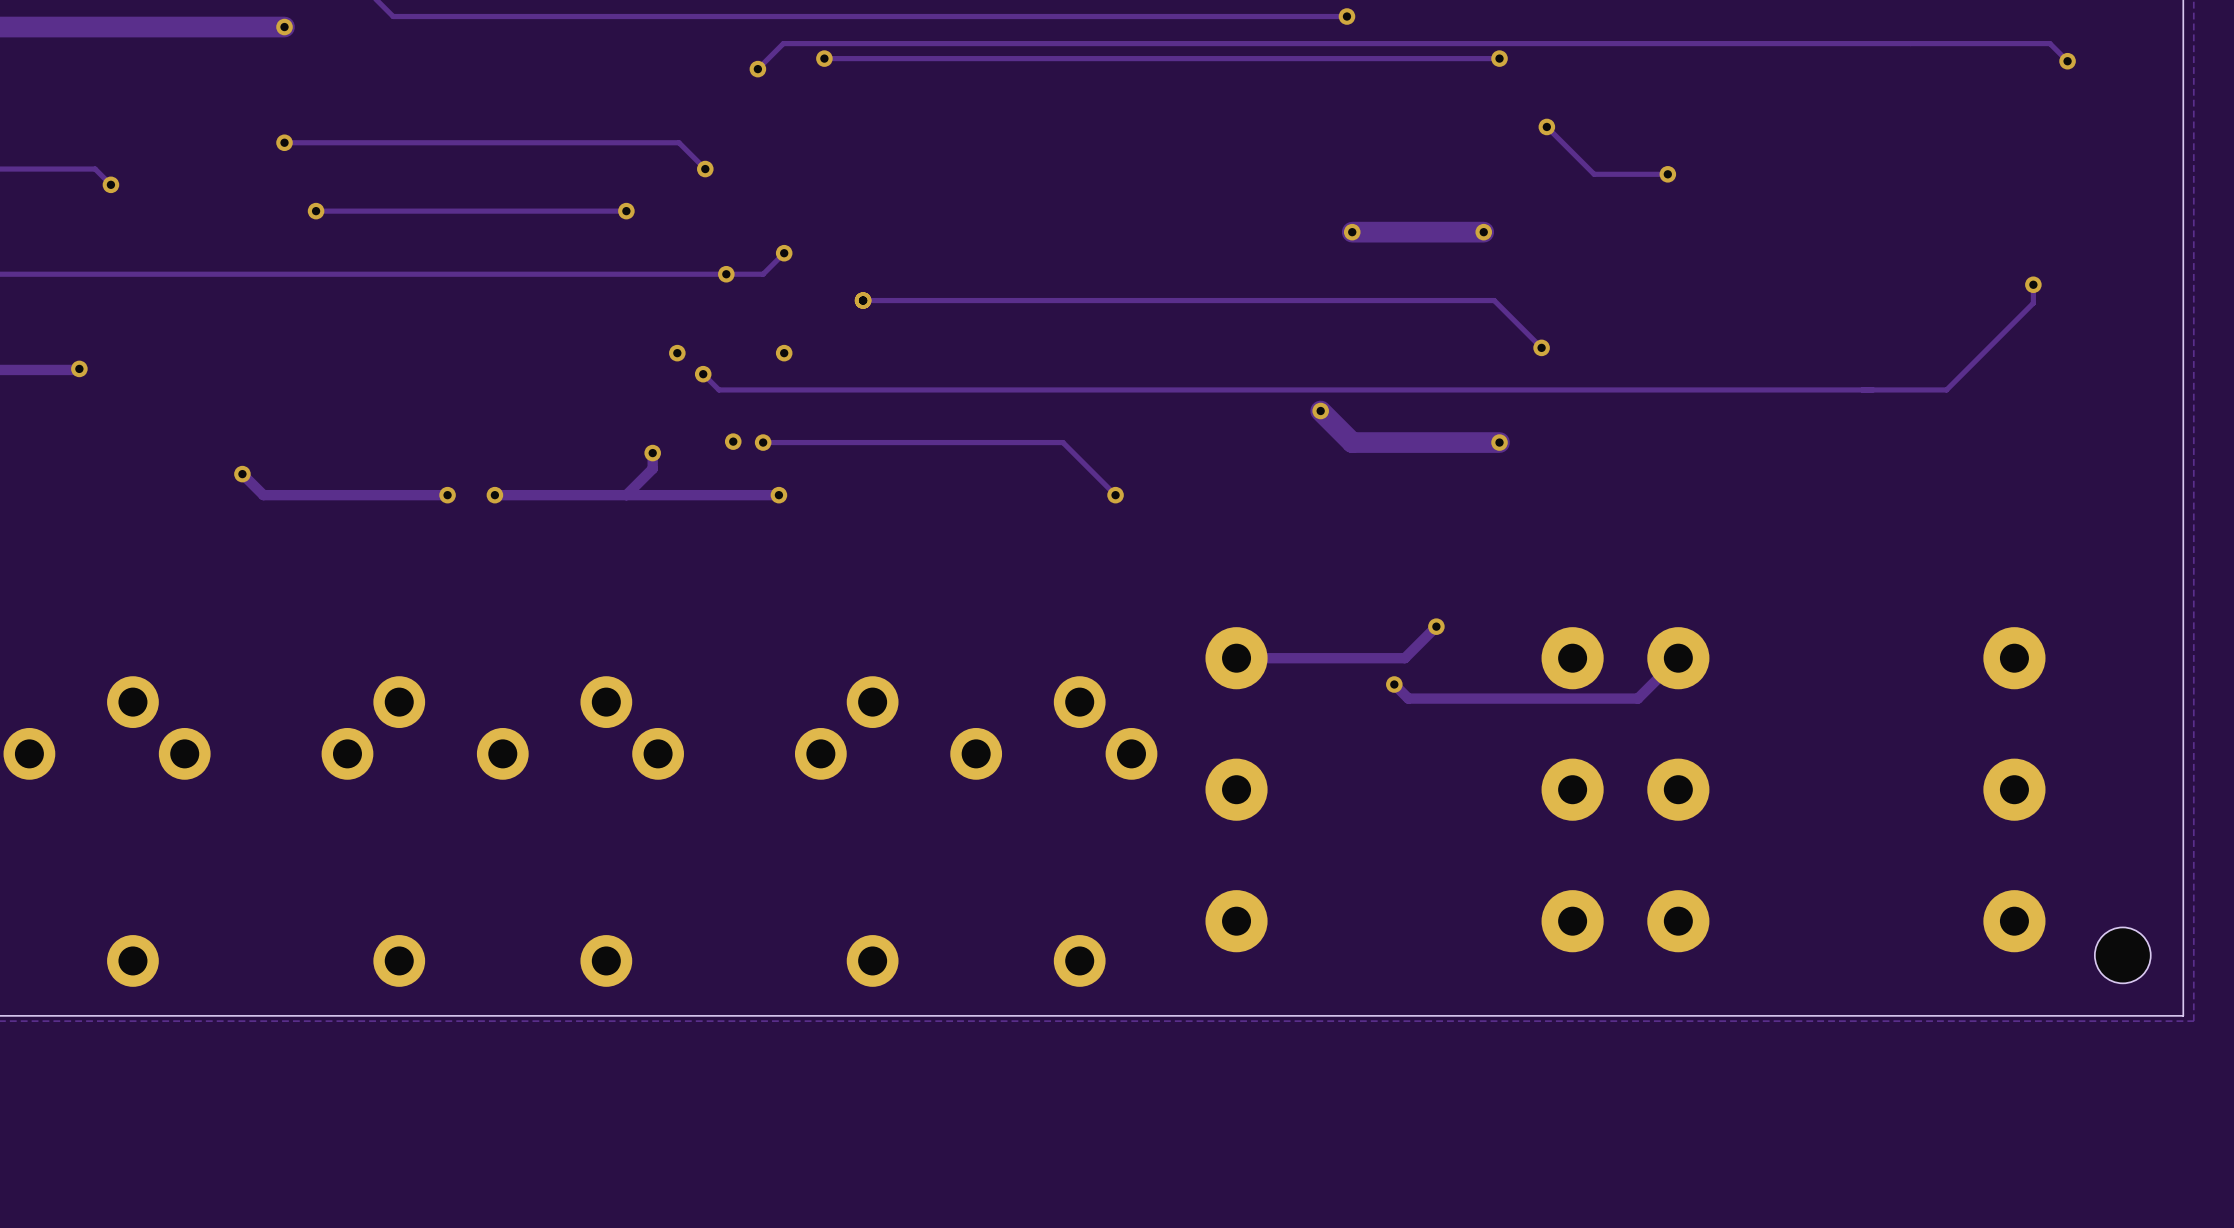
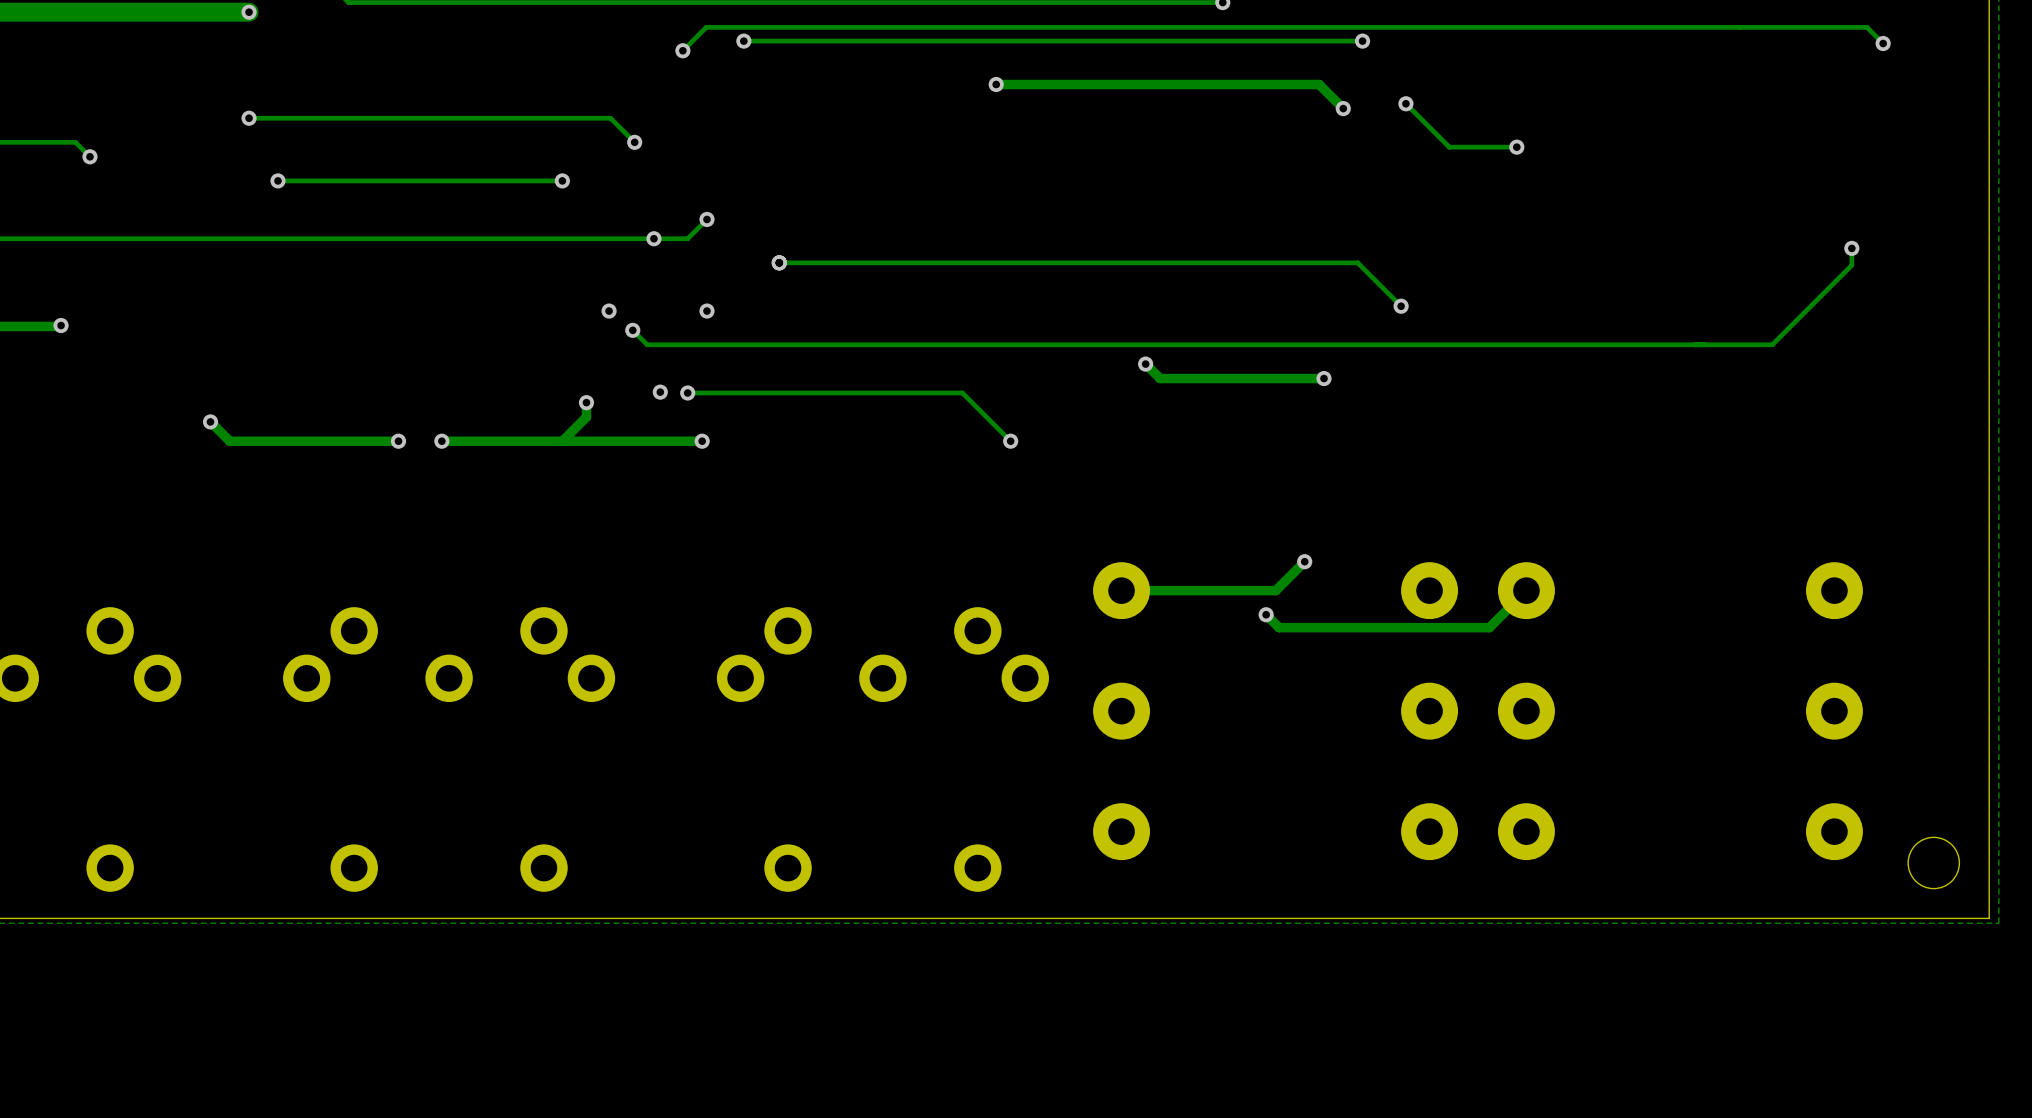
track: none -> (996, 84) (1319, 84) (1343, 108)
via: none -> (996, 84)
via: none -> (1343, 108)
via: (1352, 232) -> none
track: (1483, 232) (1352, 232) -> none
via: (1483, 232) -> none
track: none -> (1145, 364) (1160, 378) (1324, 378)
track: (1320, 410) (1352, 442) (1499, 442) -> none
via position: (1320, 410) -> (1145, 364)
via position: (1499, 442) -> (1324, 378)

